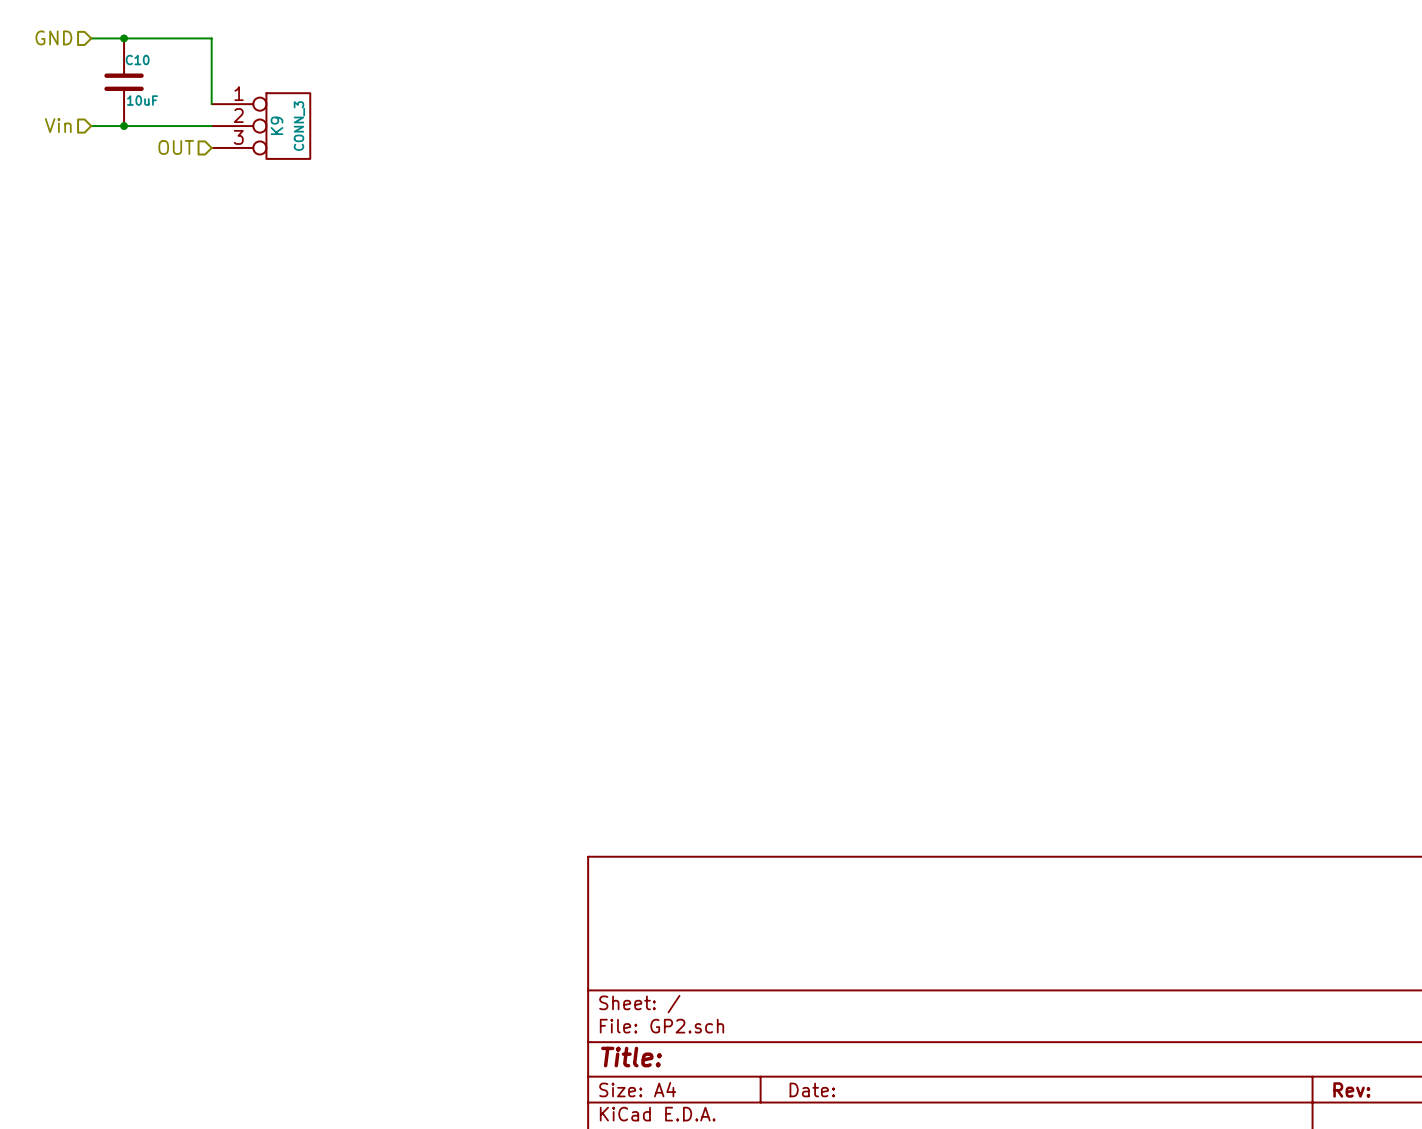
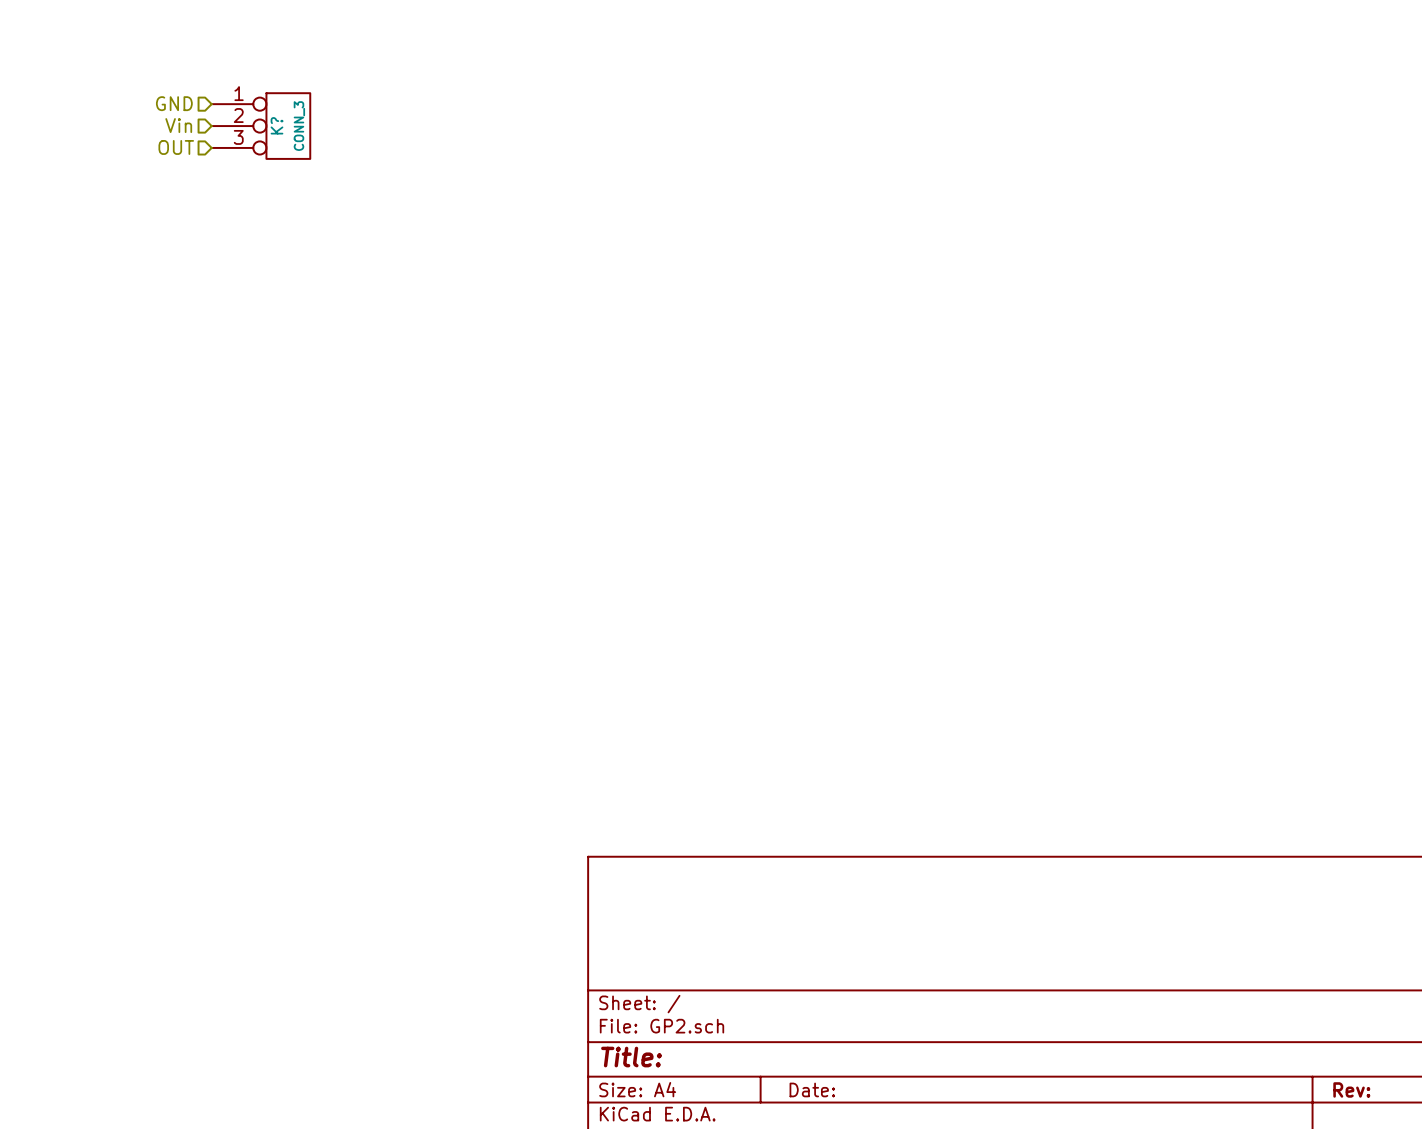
hierarchical label position: GND (53, 37) -> GND (174, 103)
wire: (91, 38) (211, 38) (211, 104) -> none
junction: (124, 38) -> none
C10: 10uF (124, 82) -> none
hierarchical label position: Vin (58, 125) -> Vin (178, 125)
K9 name: K9 (276, 125) -> K? (276, 125)
wire: (91, 126) (211, 126) -> none
junction: (124, 126) -> none

